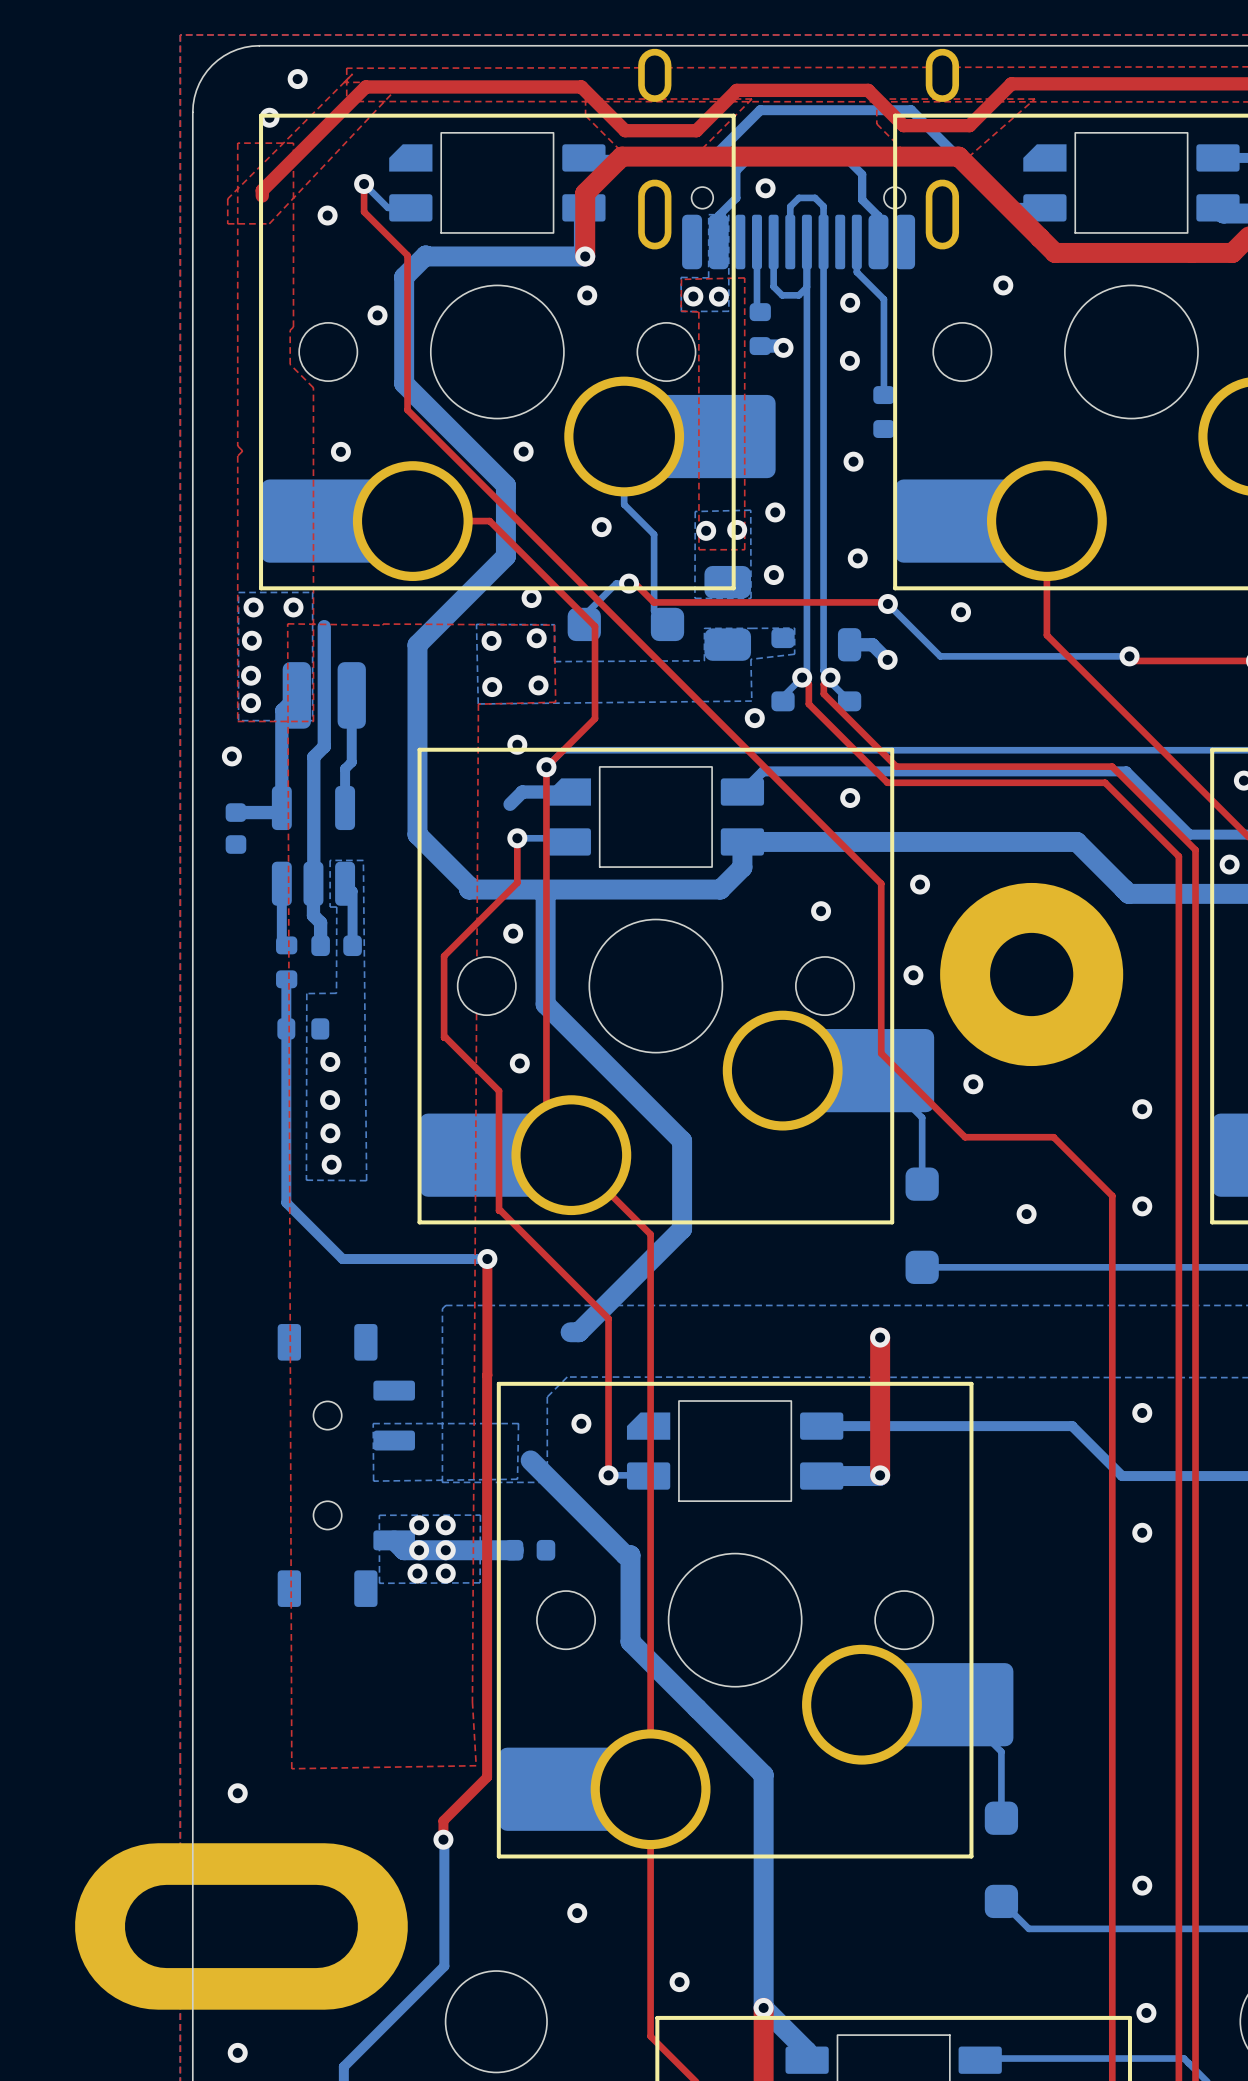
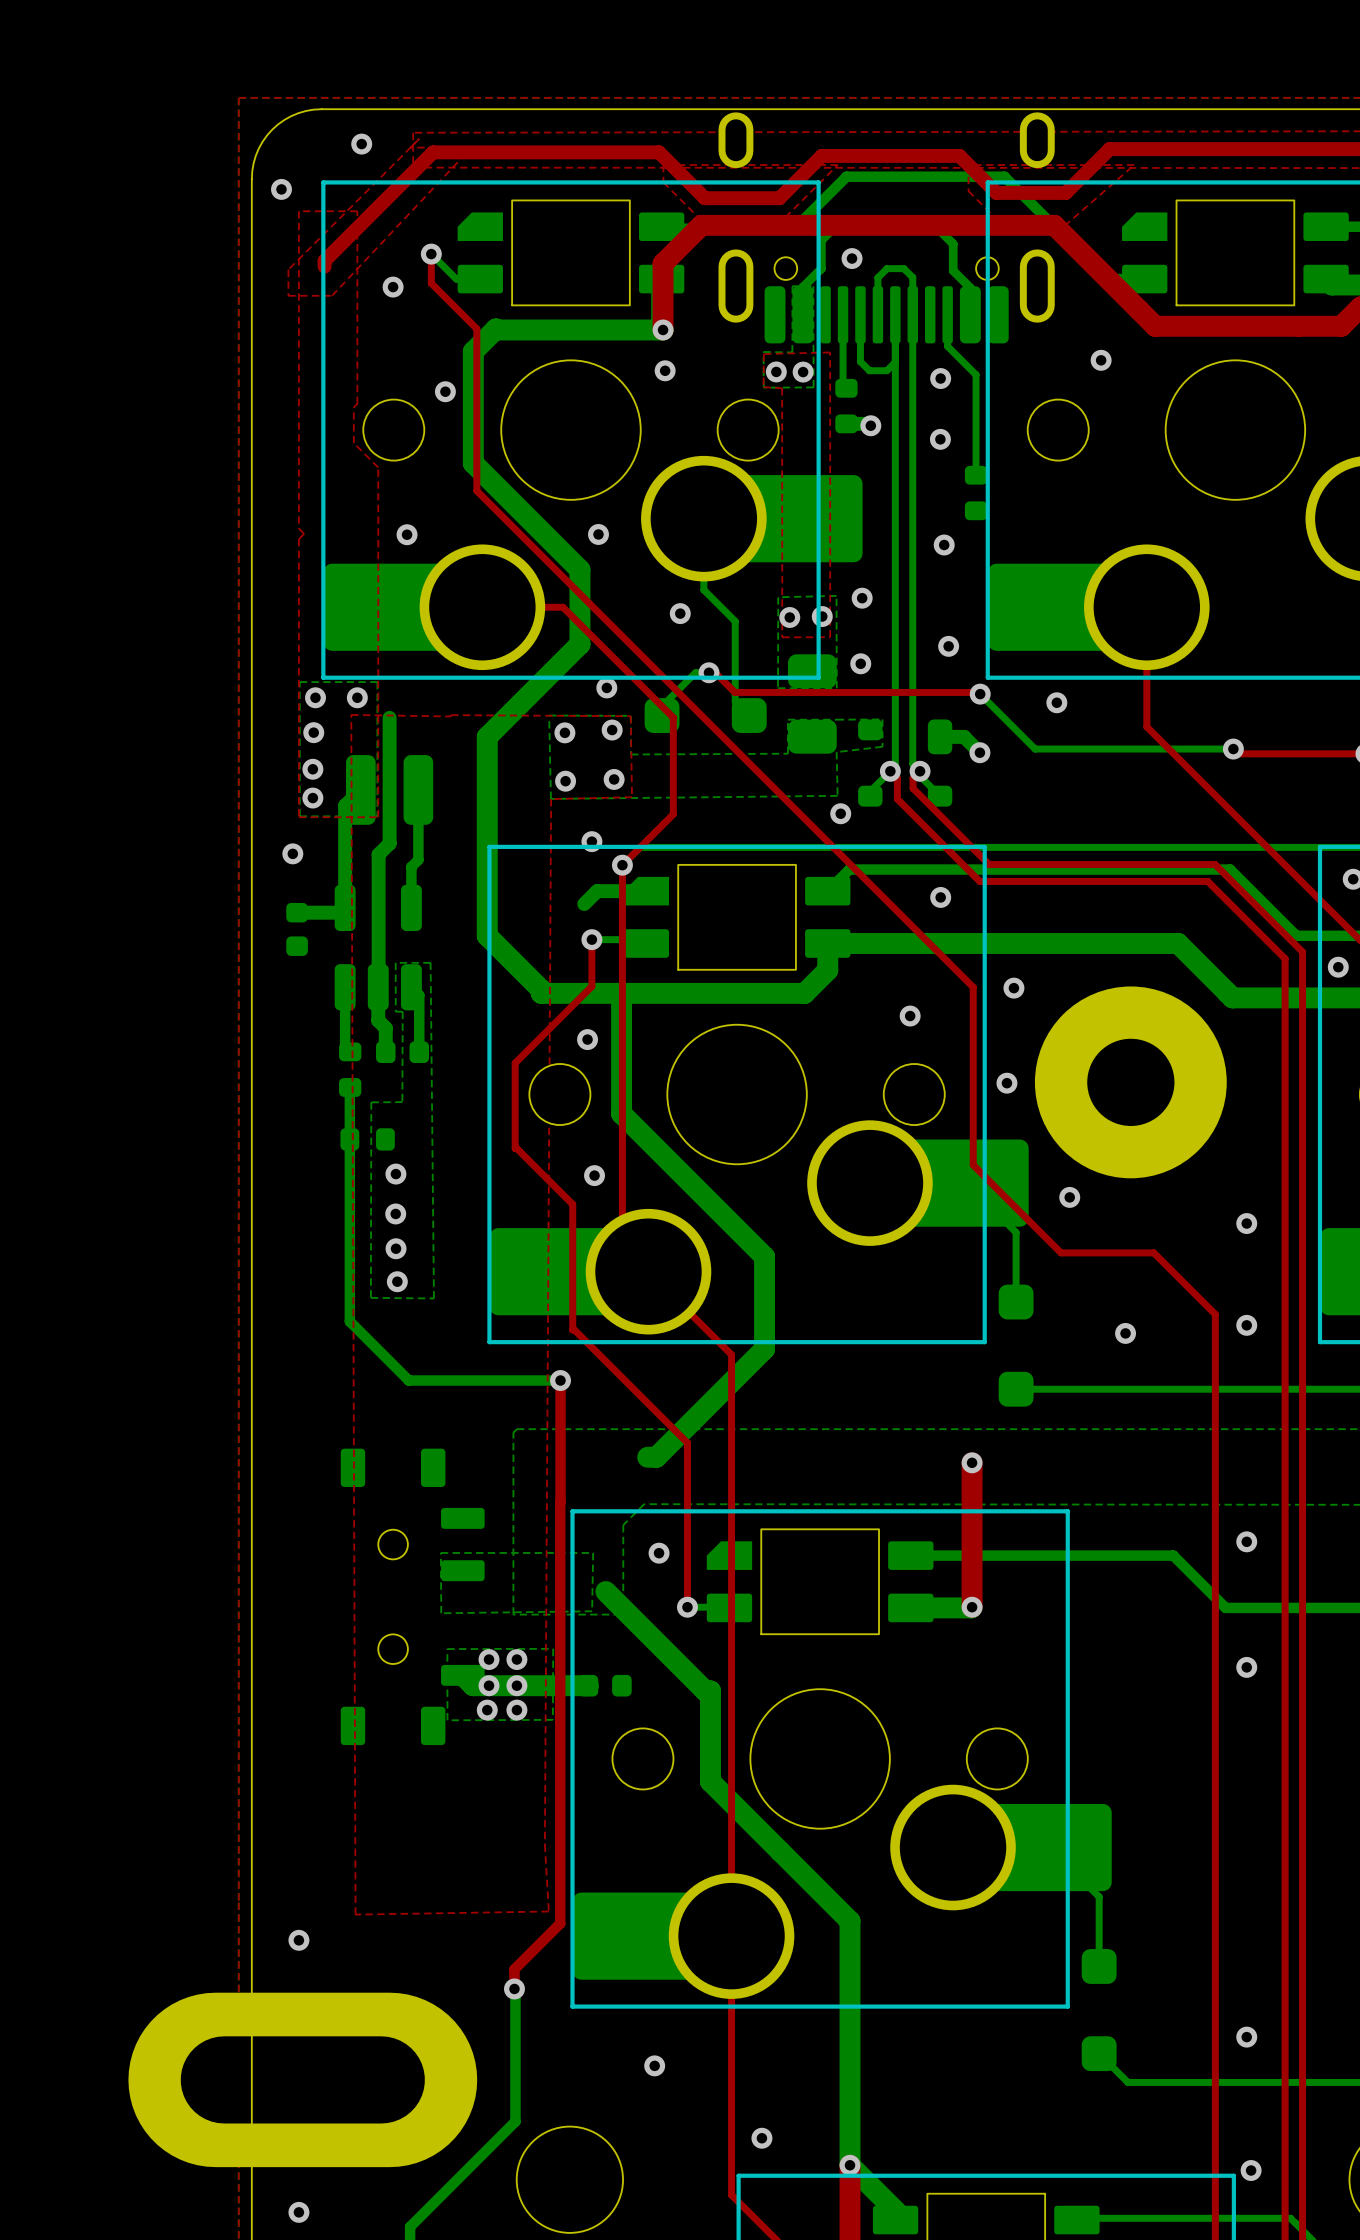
via position: (269, 117) -> (281, 189)

